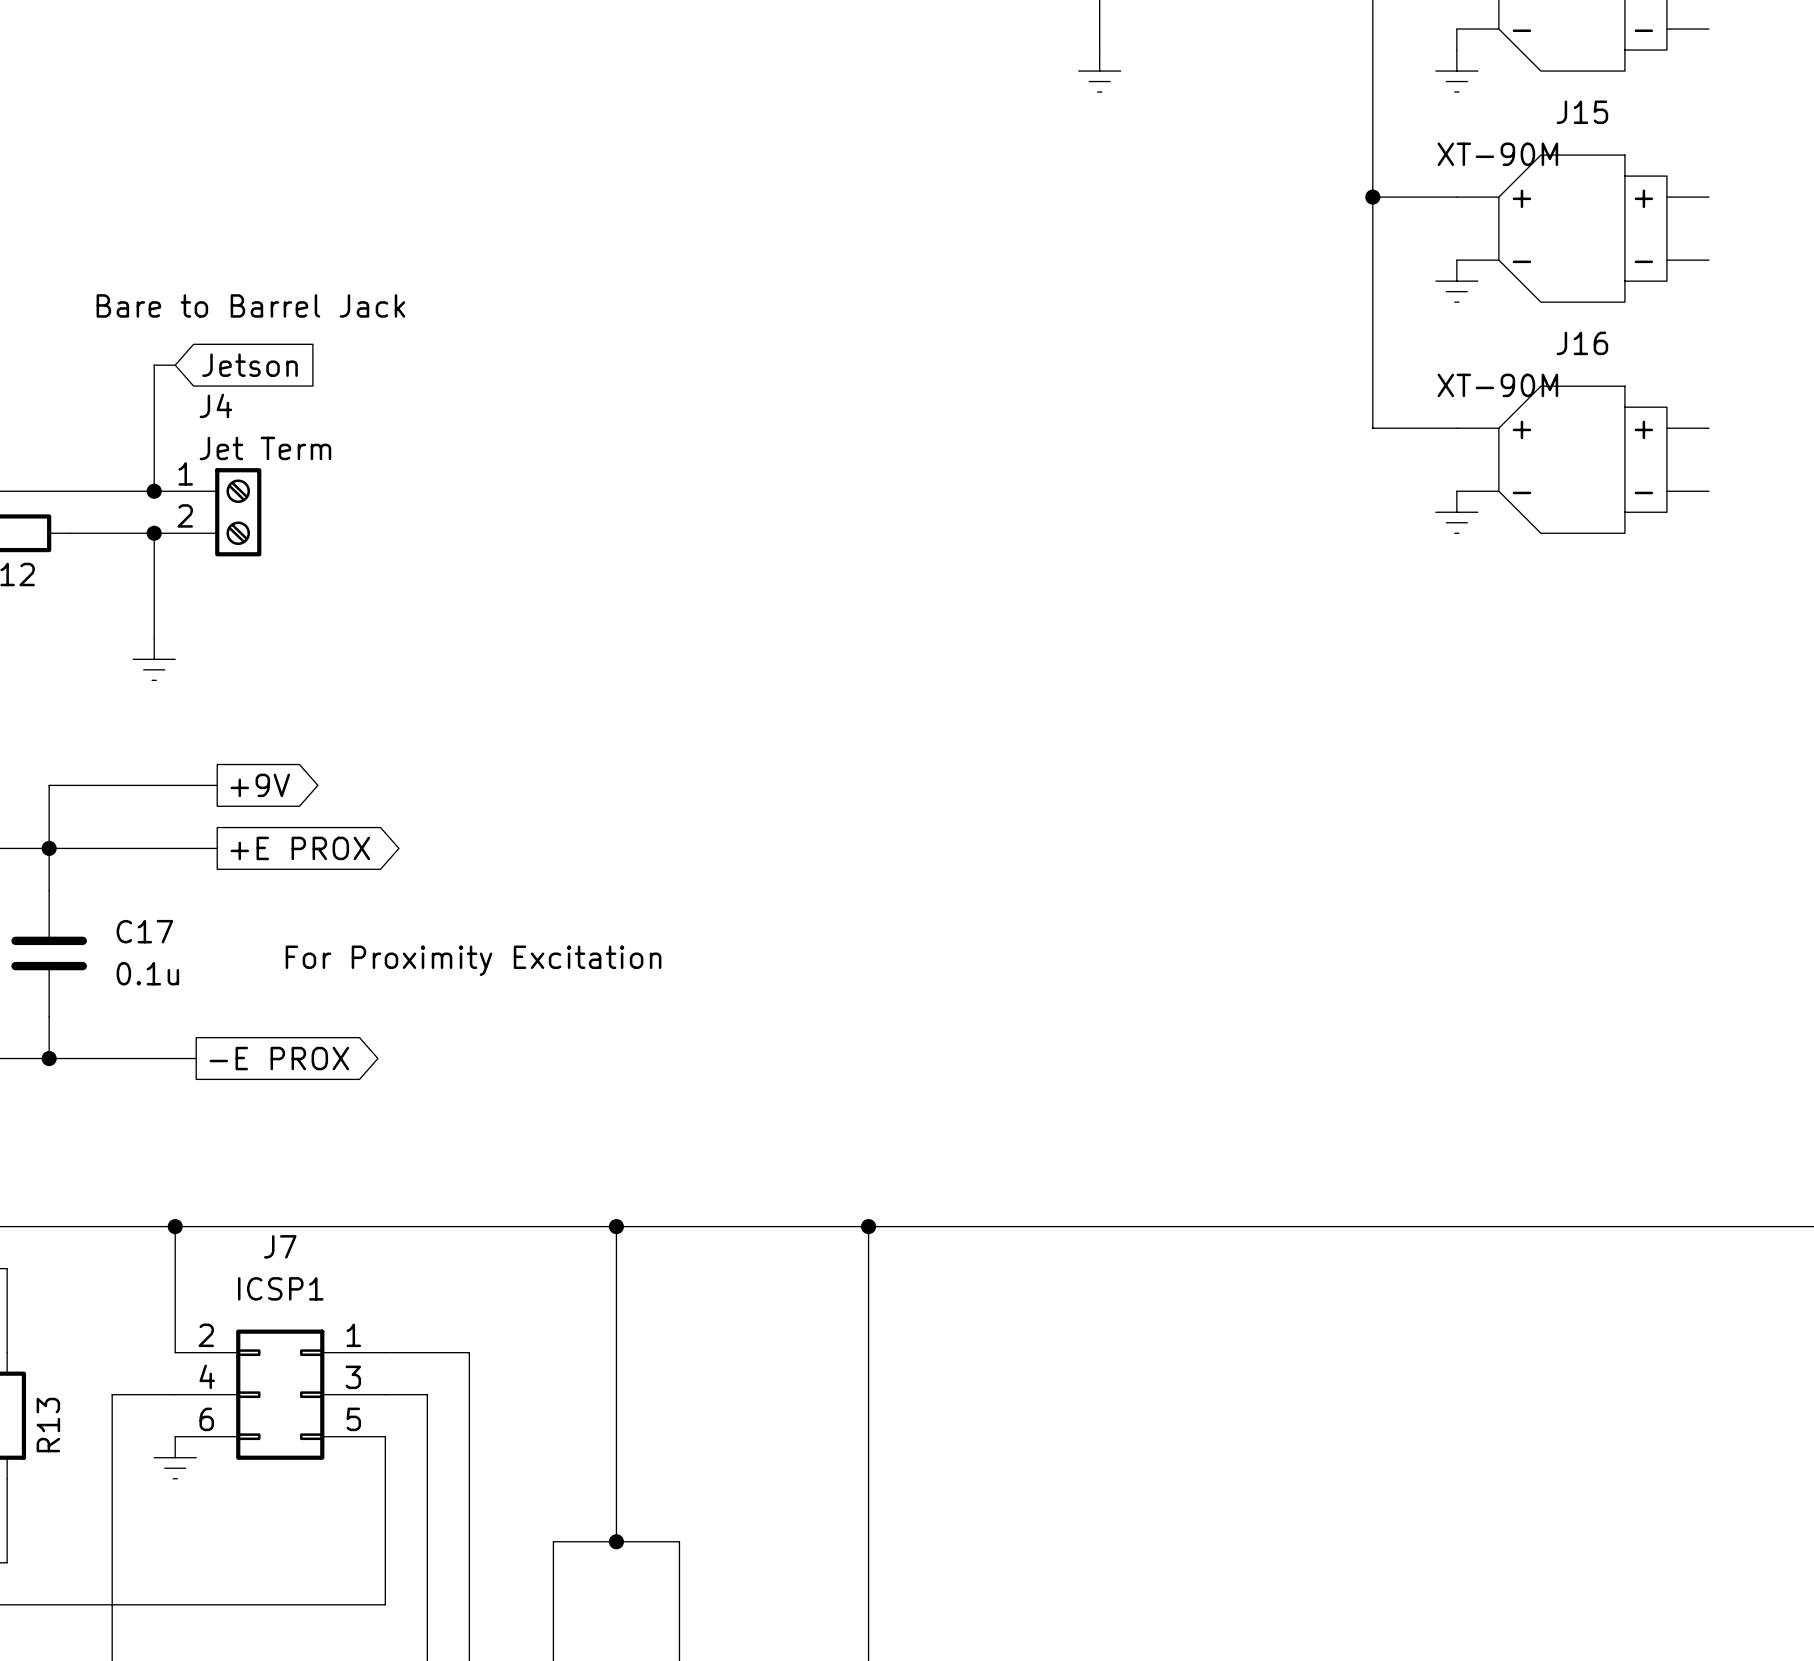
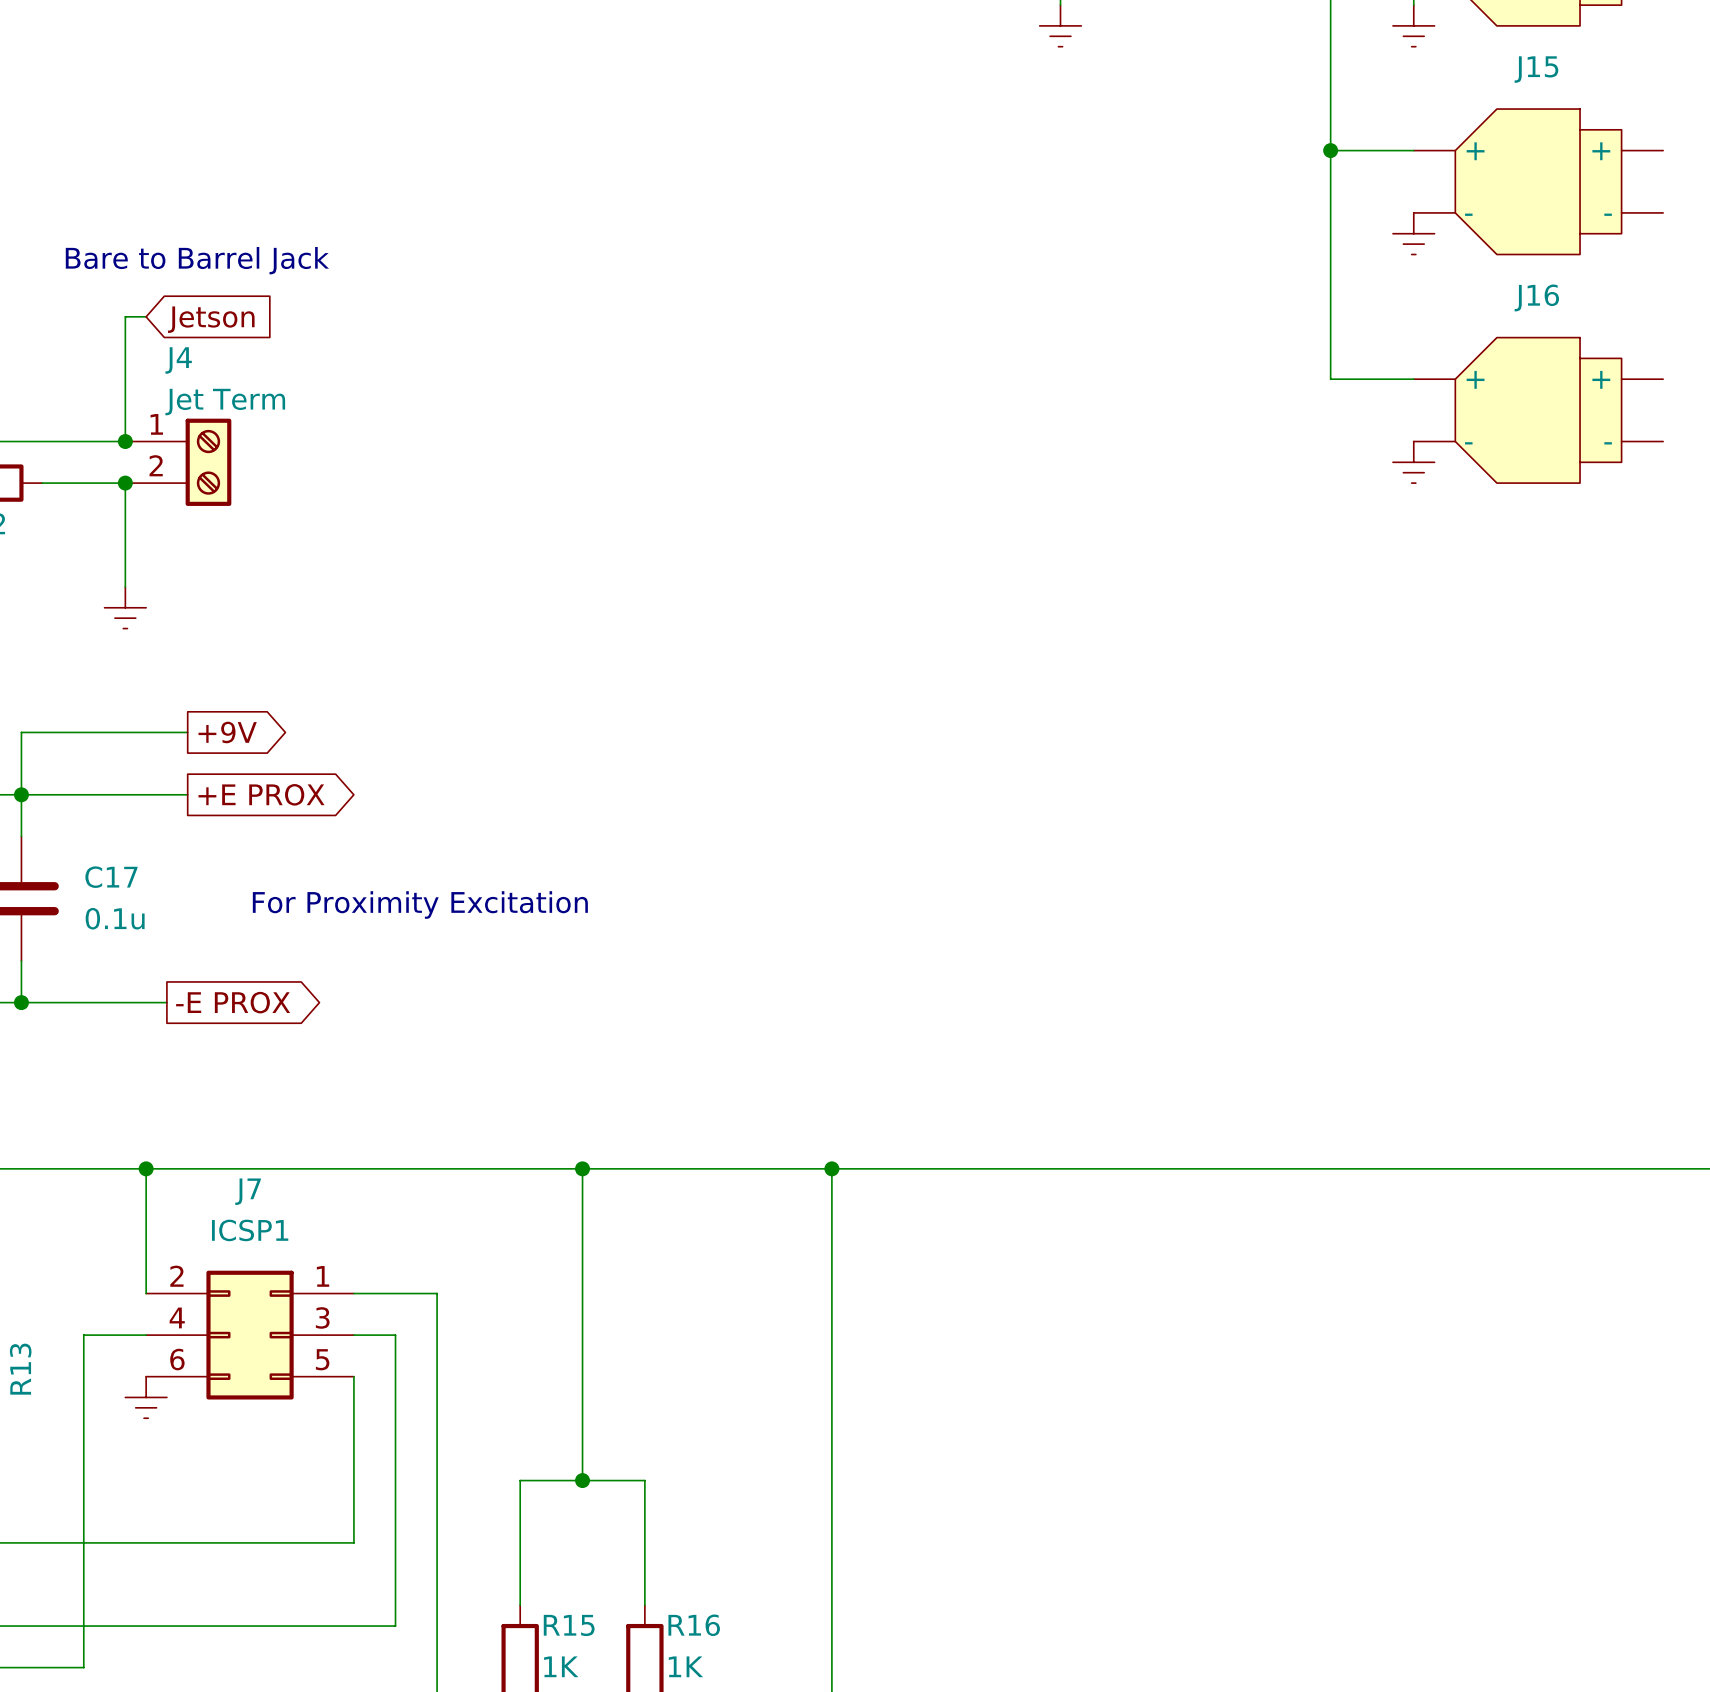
J15 value: XT-90M (1497, 154) -> none
J16 value: XT-90M (1497, 385) -> none

